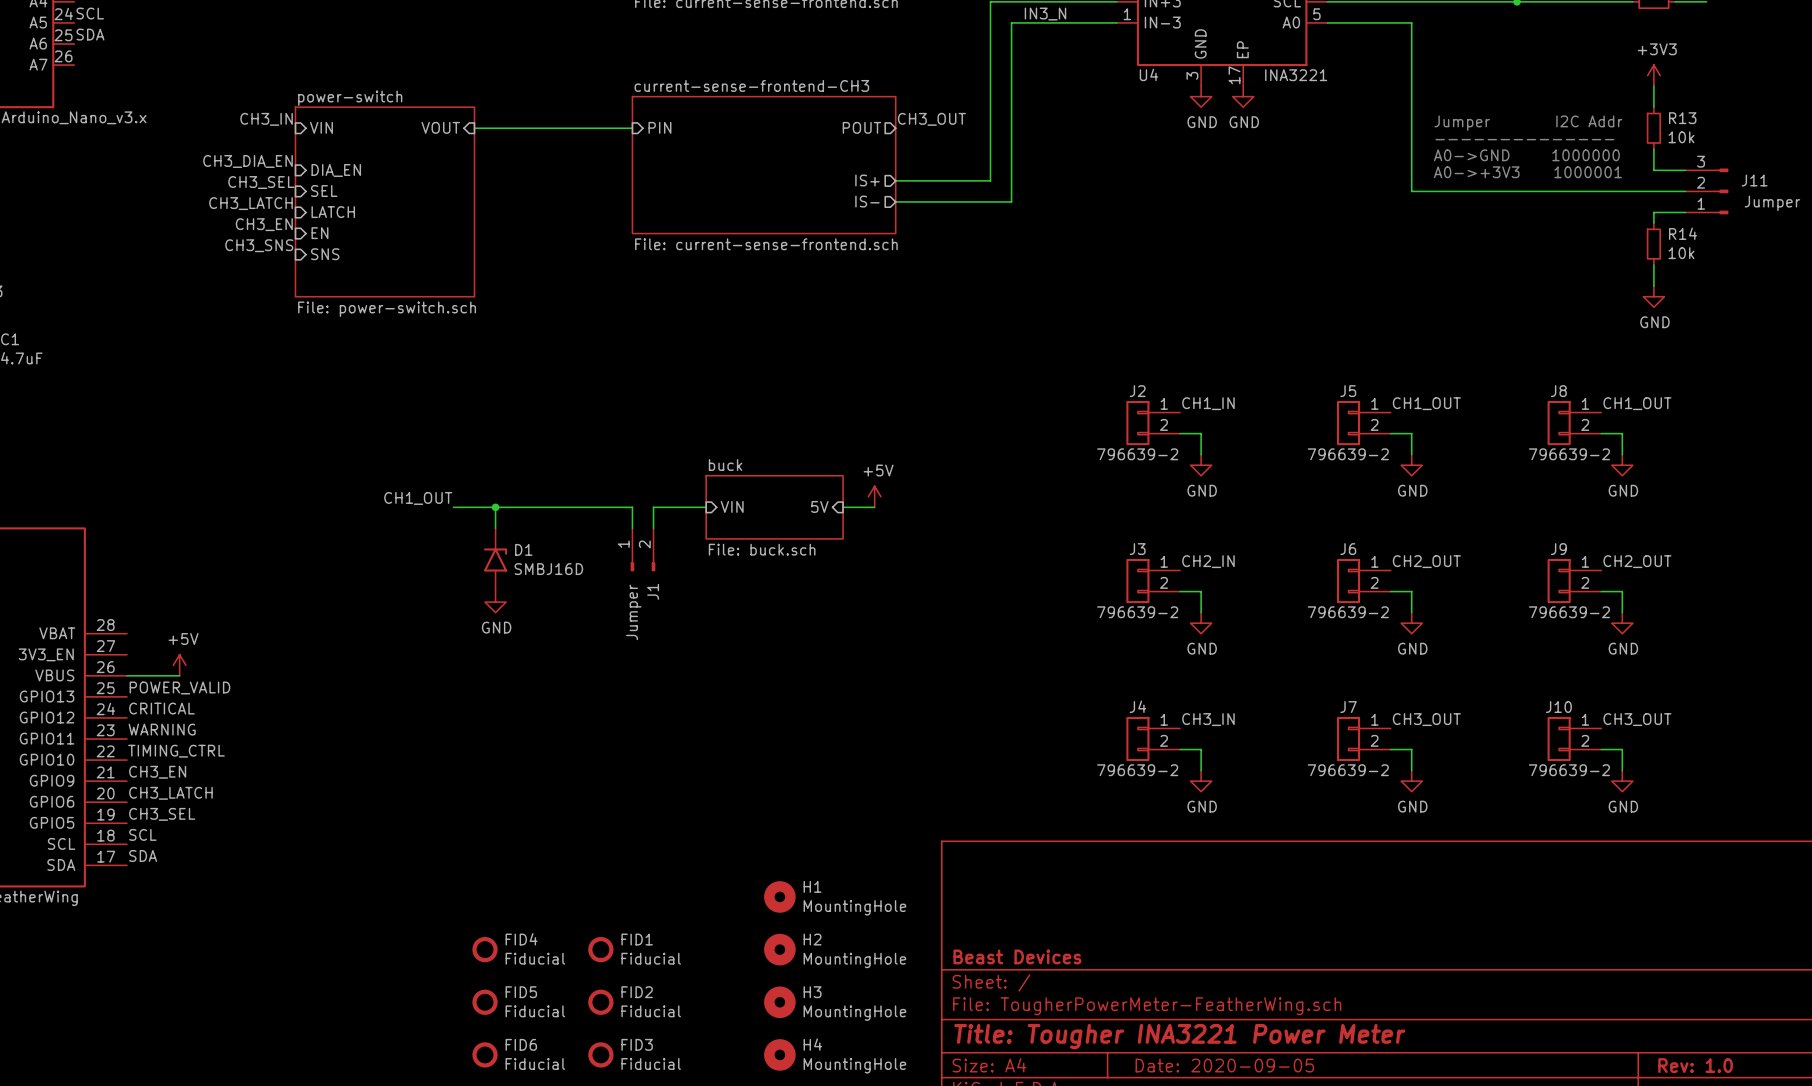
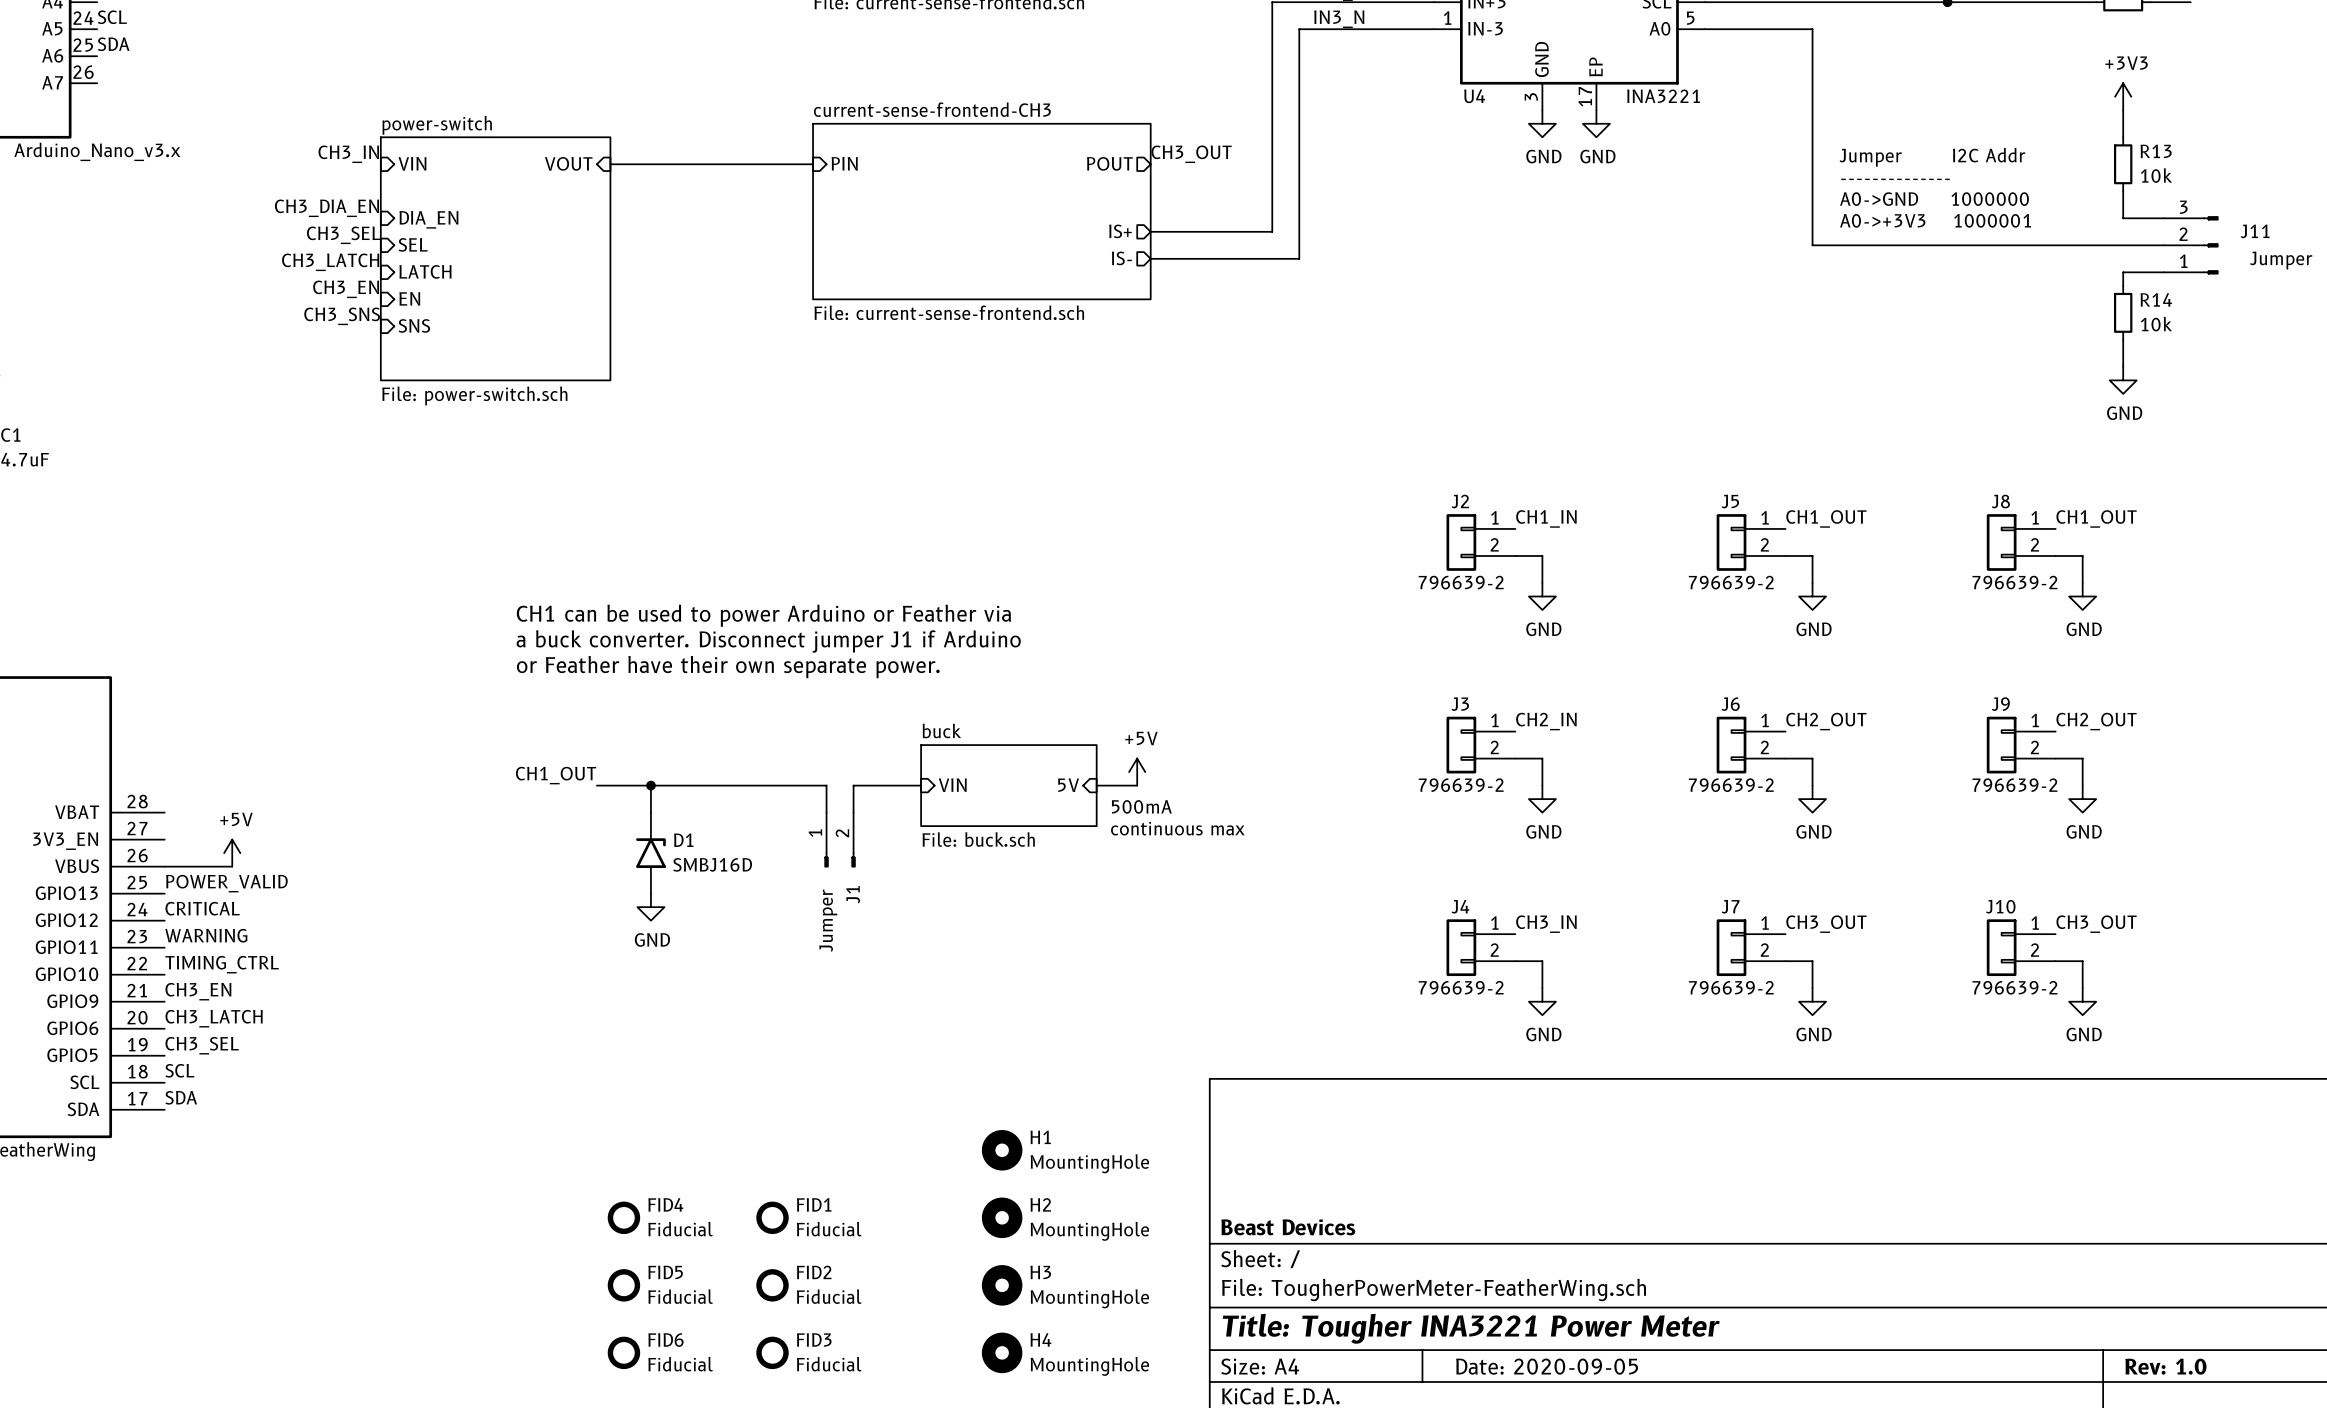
text: none -> CH1 can be used to power Arduino or Feather via (763, 615)
power symbol position: +5V (874, 496) -> +5V (1137, 772)
label position: CH1_OUT (418, 498) -> CH1_OUT (556, 775)
text: none -> a buck converter. Disconnect jumper J1 if Arduino (768, 641)
sheet pin position: VIN (732, 506) -> VIN (952, 785)
sheet pin position: 5V (819, 506) -> 5V (1068, 785)
wire: (453, 507) (632, 507) (632, 528) -> (596, 785) (826, 785) (826, 812)
wire: (495, 507) (495, 528) -> (650, 785) (650, 812)
junction: (495, 507) -> none
wire: (706, 507) (653, 507) (653, 528) -> (921, 785) (853, 785) (853, 812)
sheet buck position: (774, 507) -> (1008, 785)
wire: (843, 507) (874, 507) -> (1096, 785) (1137, 785)
text: none -> or Feather have their own separate power. (728, 667)
J1 position: (642, 549) -> (840, 840)
D1 position: (495, 559) -> (650, 853)
power symbol position: GND (495, 602) -> GND (650, 907)
junction: none -> (650, 785)
text: none -> 500mA (1141, 806)
text: none -> continuous max (1177, 828)

